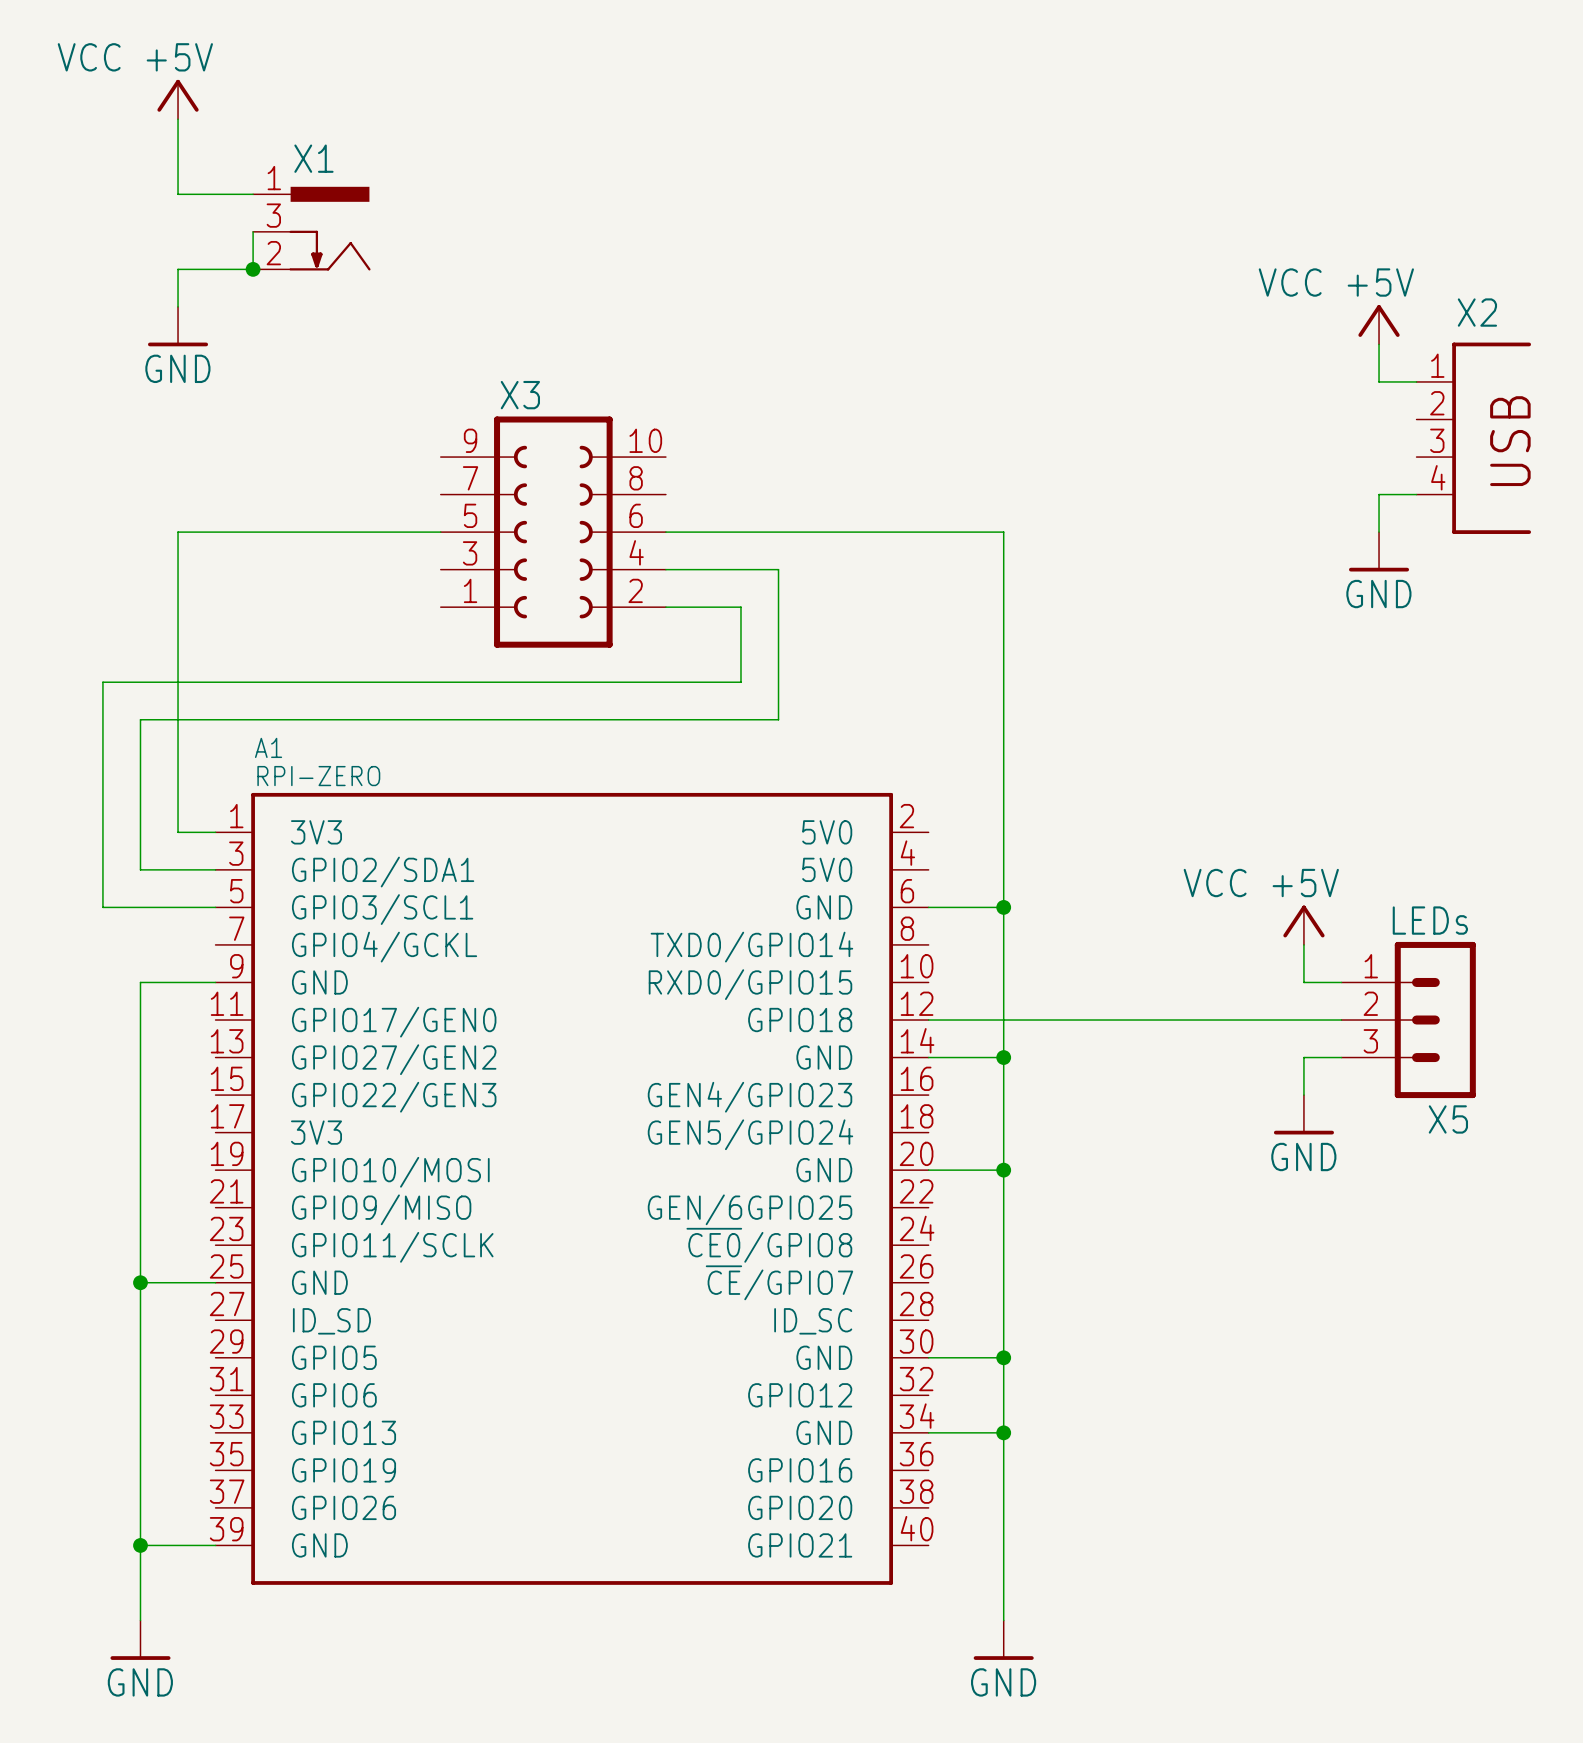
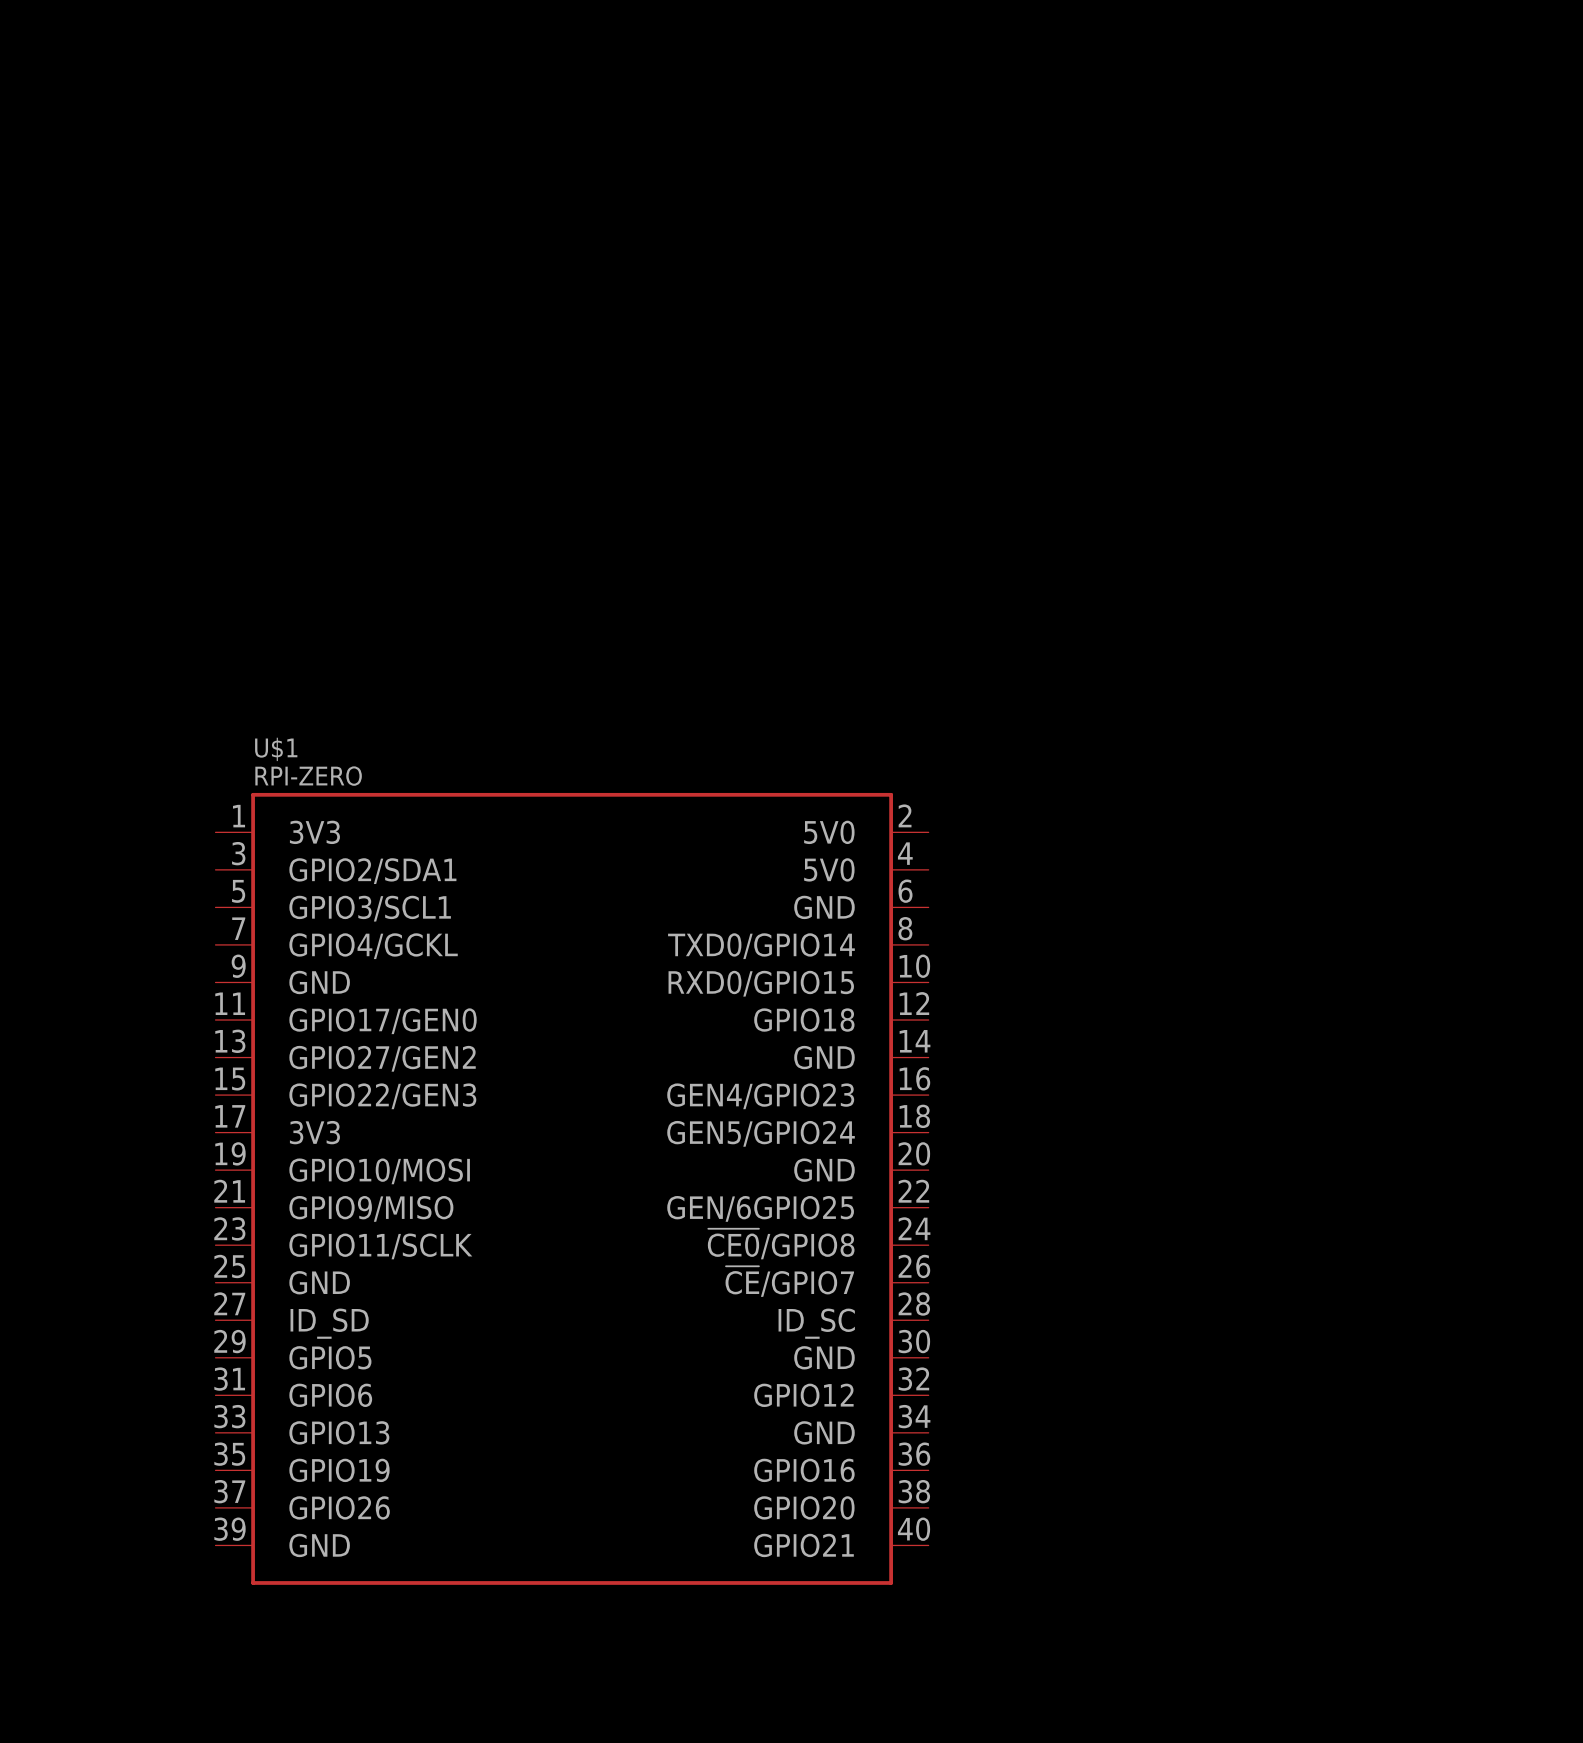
power symbol: VCC +5V (178, 99) -> none
wire: (178, 119) (178, 194) (253, 194) -> none
X1: (311, 228) -> none
wire: (253, 231) (253, 269) (178, 269) (178, 306) -> none
junction: (253, 269) -> none
power symbol: VCC +5V (1379, 324) -> none
power symbol: GND (178, 326) -> none
wire: (1379, 344) (1379, 381) (1416, 381) -> none
X2: (1473, 438) -> none
wire: (1416, 494) (1379, 494) (1379, 532) -> none
wire: (440, 532) (178, 532) (178, 832) (215, 832) -> none
X3: (553, 532) -> none
wire: (665, 532) (1003, 532) (1003, 1620) -> none
power symbol: GND (1379, 551) -> none
wire: (665, 569) (778, 569) (778, 719) (140, 719) (140, 869) (215, 869) -> none
wire: (665, 607) (740, 607) (740, 682) (102, 682) (102, 907) (215, 907) -> none
A1 name: A1 (268, 747) -> U$1 (276, 749)
wire: (928, 907) (1003, 907) -> none
junction: (1003, 907) -> none
power symbol: VCC +5V (1303, 925) -> none
wire: (1303, 944) (1303, 982) (1341, 982) -> none
wire: (215, 982) (140, 982) (140, 1620) -> none
wire: (928, 1020) (1341, 1020) -> none
X5: LEDs (1408, 1020) -> none
wire: (928, 1057) (1003, 1057) -> none
junction: (1003, 1057) -> none
wire: (1341, 1057) (1303, 1057) (1303, 1095) -> none
power symbol: GND (1303, 1114) -> none
wire: (928, 1170) (1003, 1170) -> none
junction: (1003, 1170) -> none
wire: (140, 1282) (215, 1282) -> none
junction: (140, 1282) -> none
wire: (928, 1357) (1003, 1357) -> none
junction: (1003, 1357) -> none
wire: (928, 1432) (1003, 1432) -> none
junction: (1003, 1432) -> none
wire: (140, 1545) (215, 1545) -> none
junction: (140, 1545) -> none
power symbol: GND (140, 1640) -> none
power symbol: GND (1003, 1640) -> none

